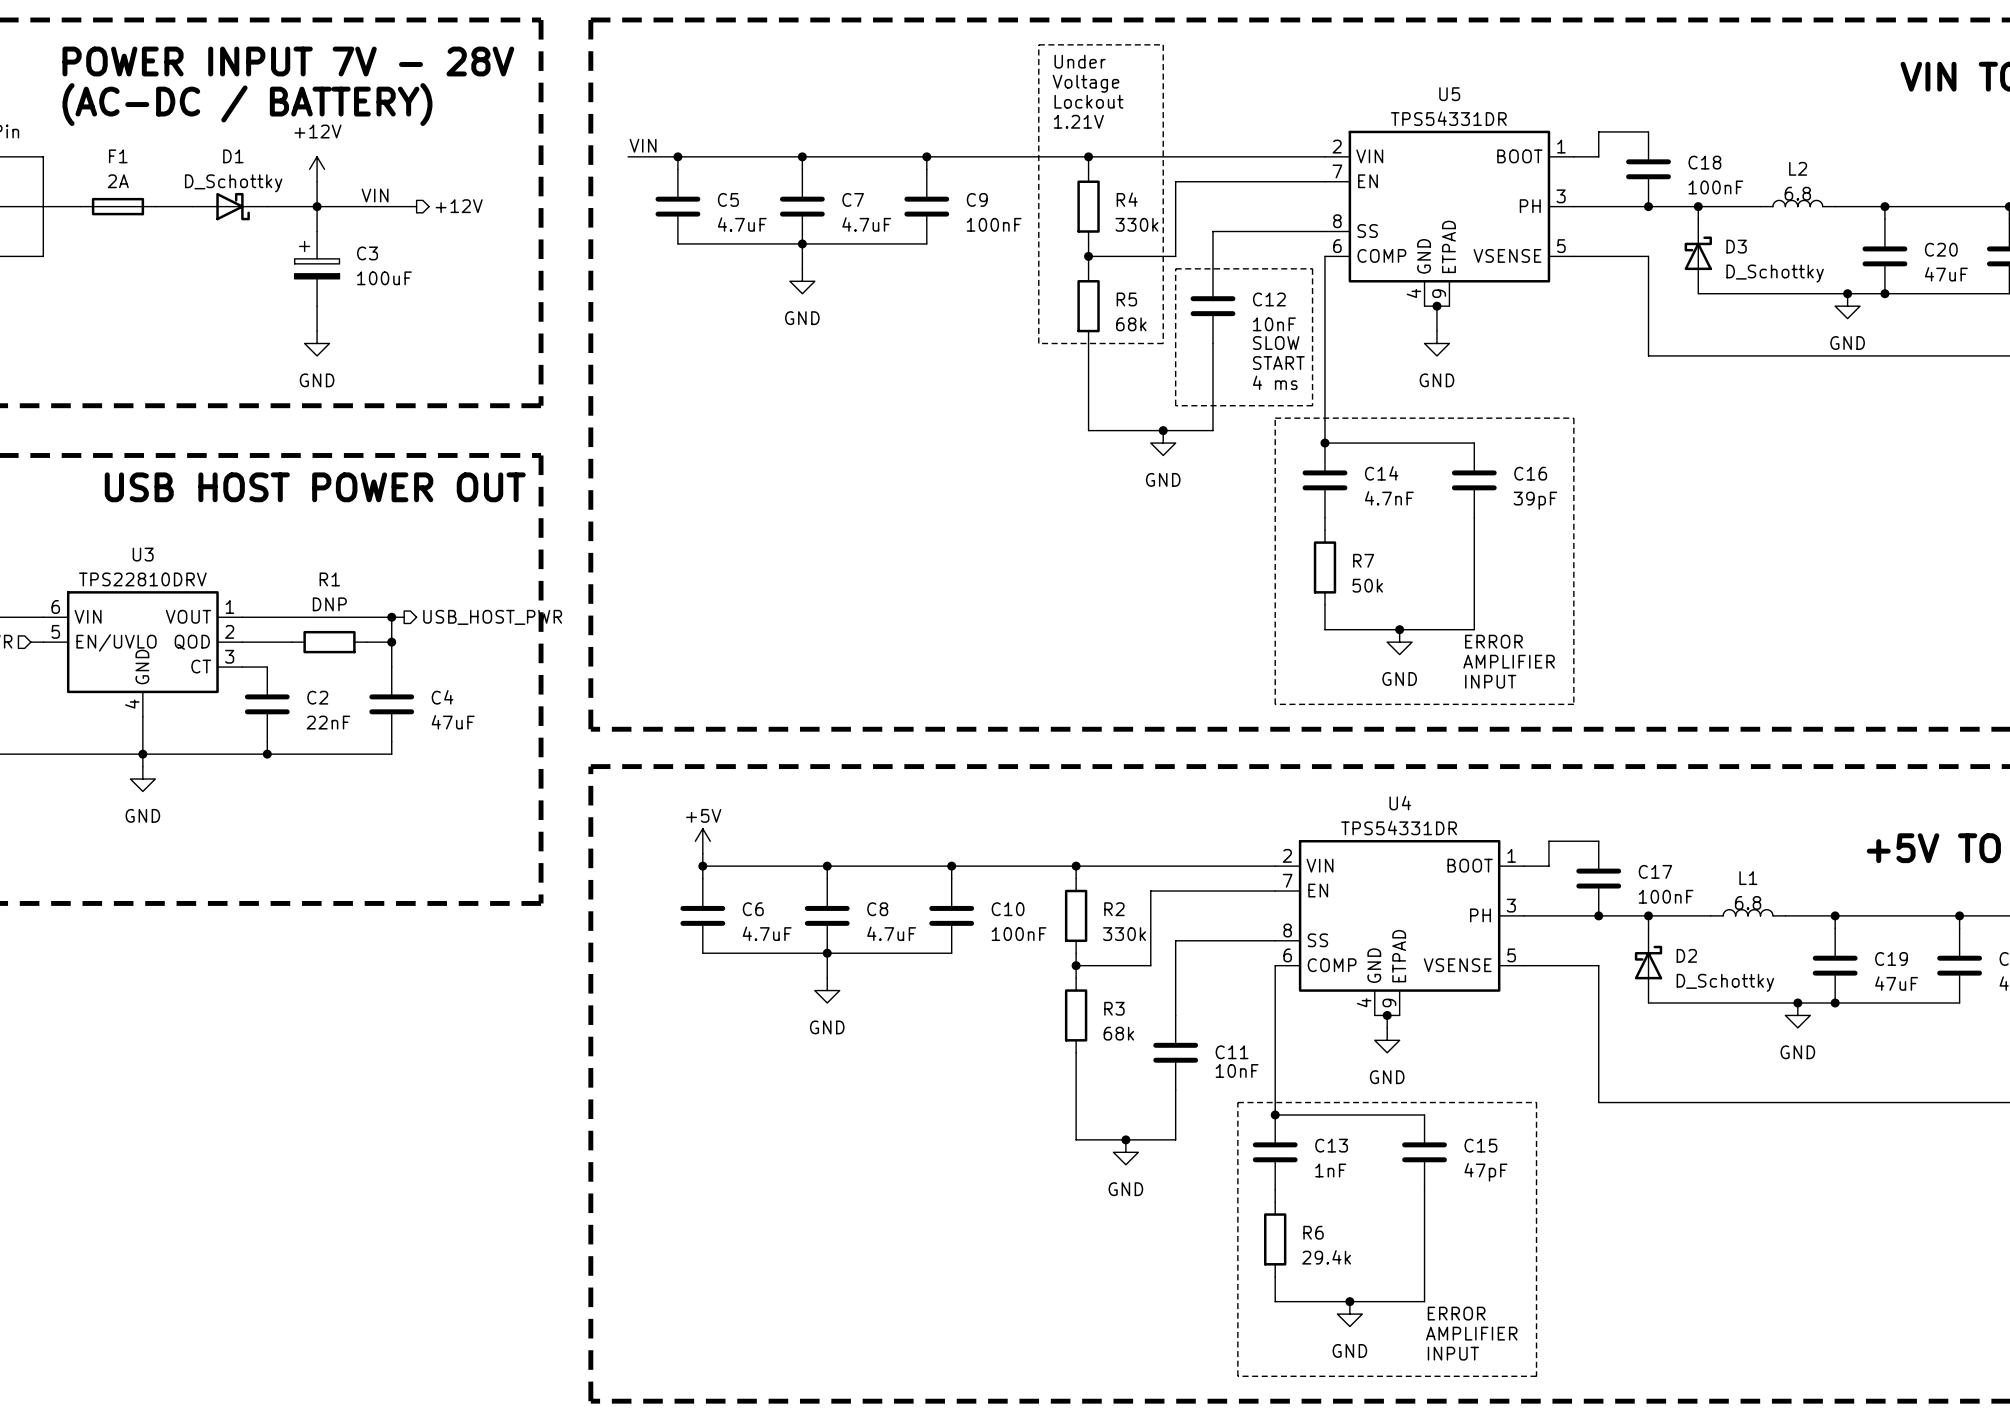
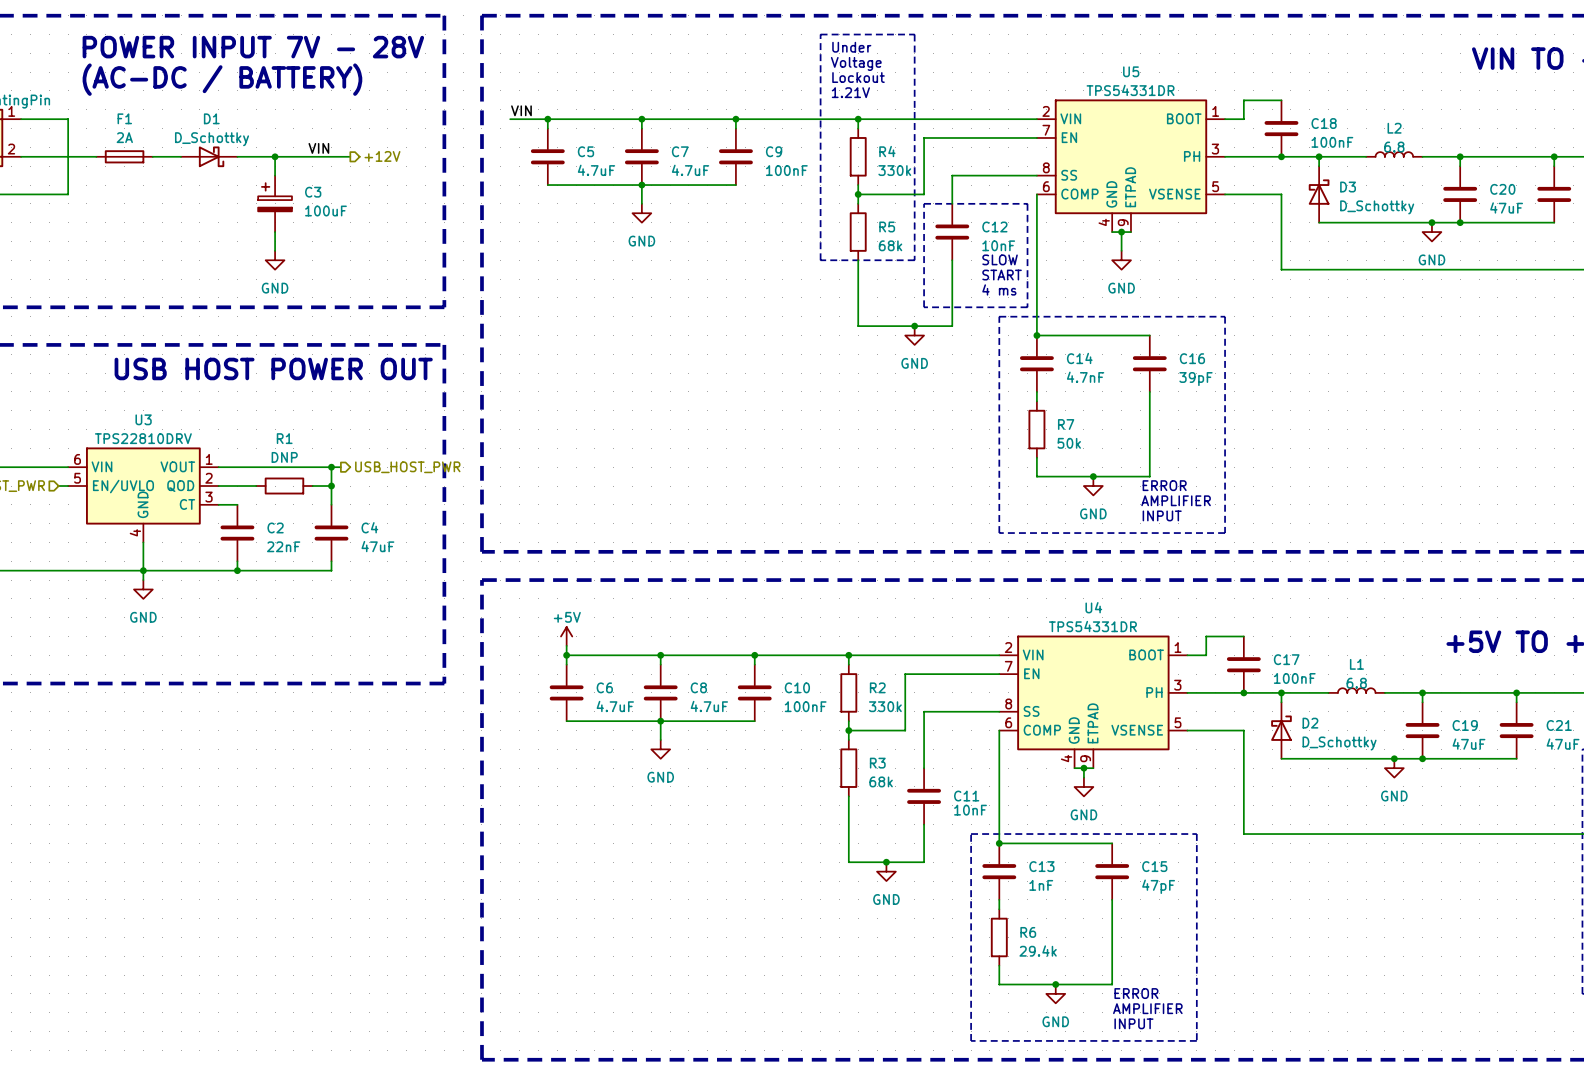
power symbol: +12V (317, 169) -> none
wire: (317, 181) (317, 206) -> none

